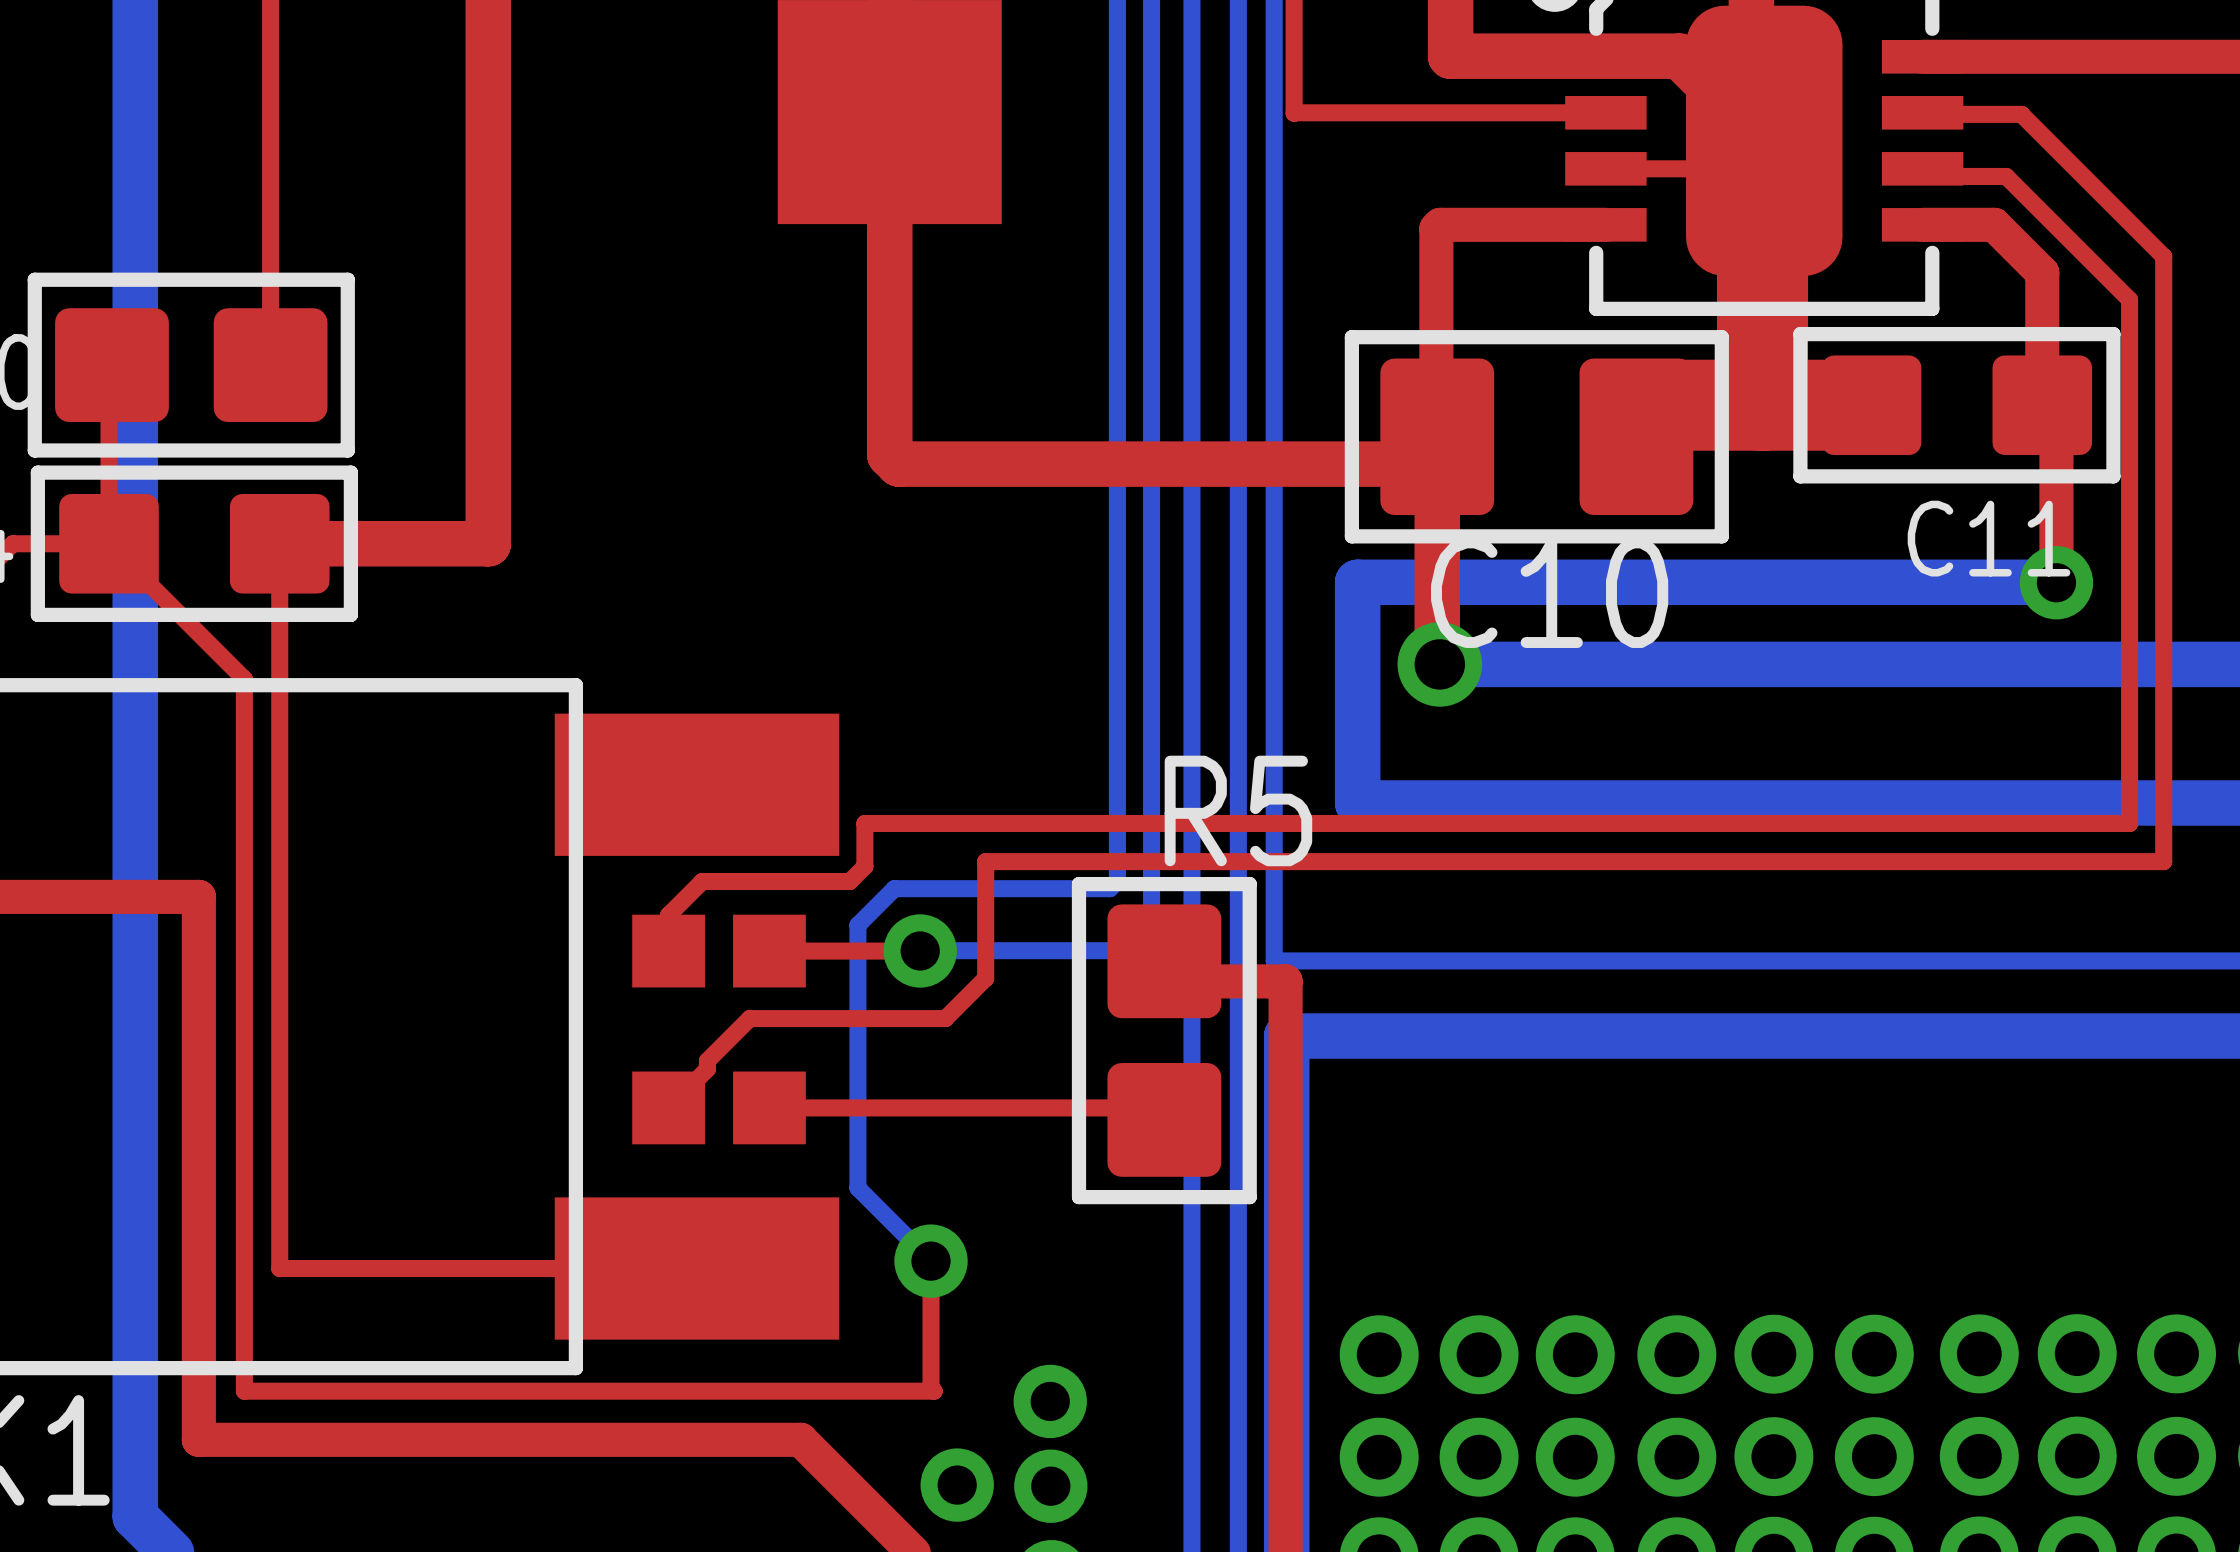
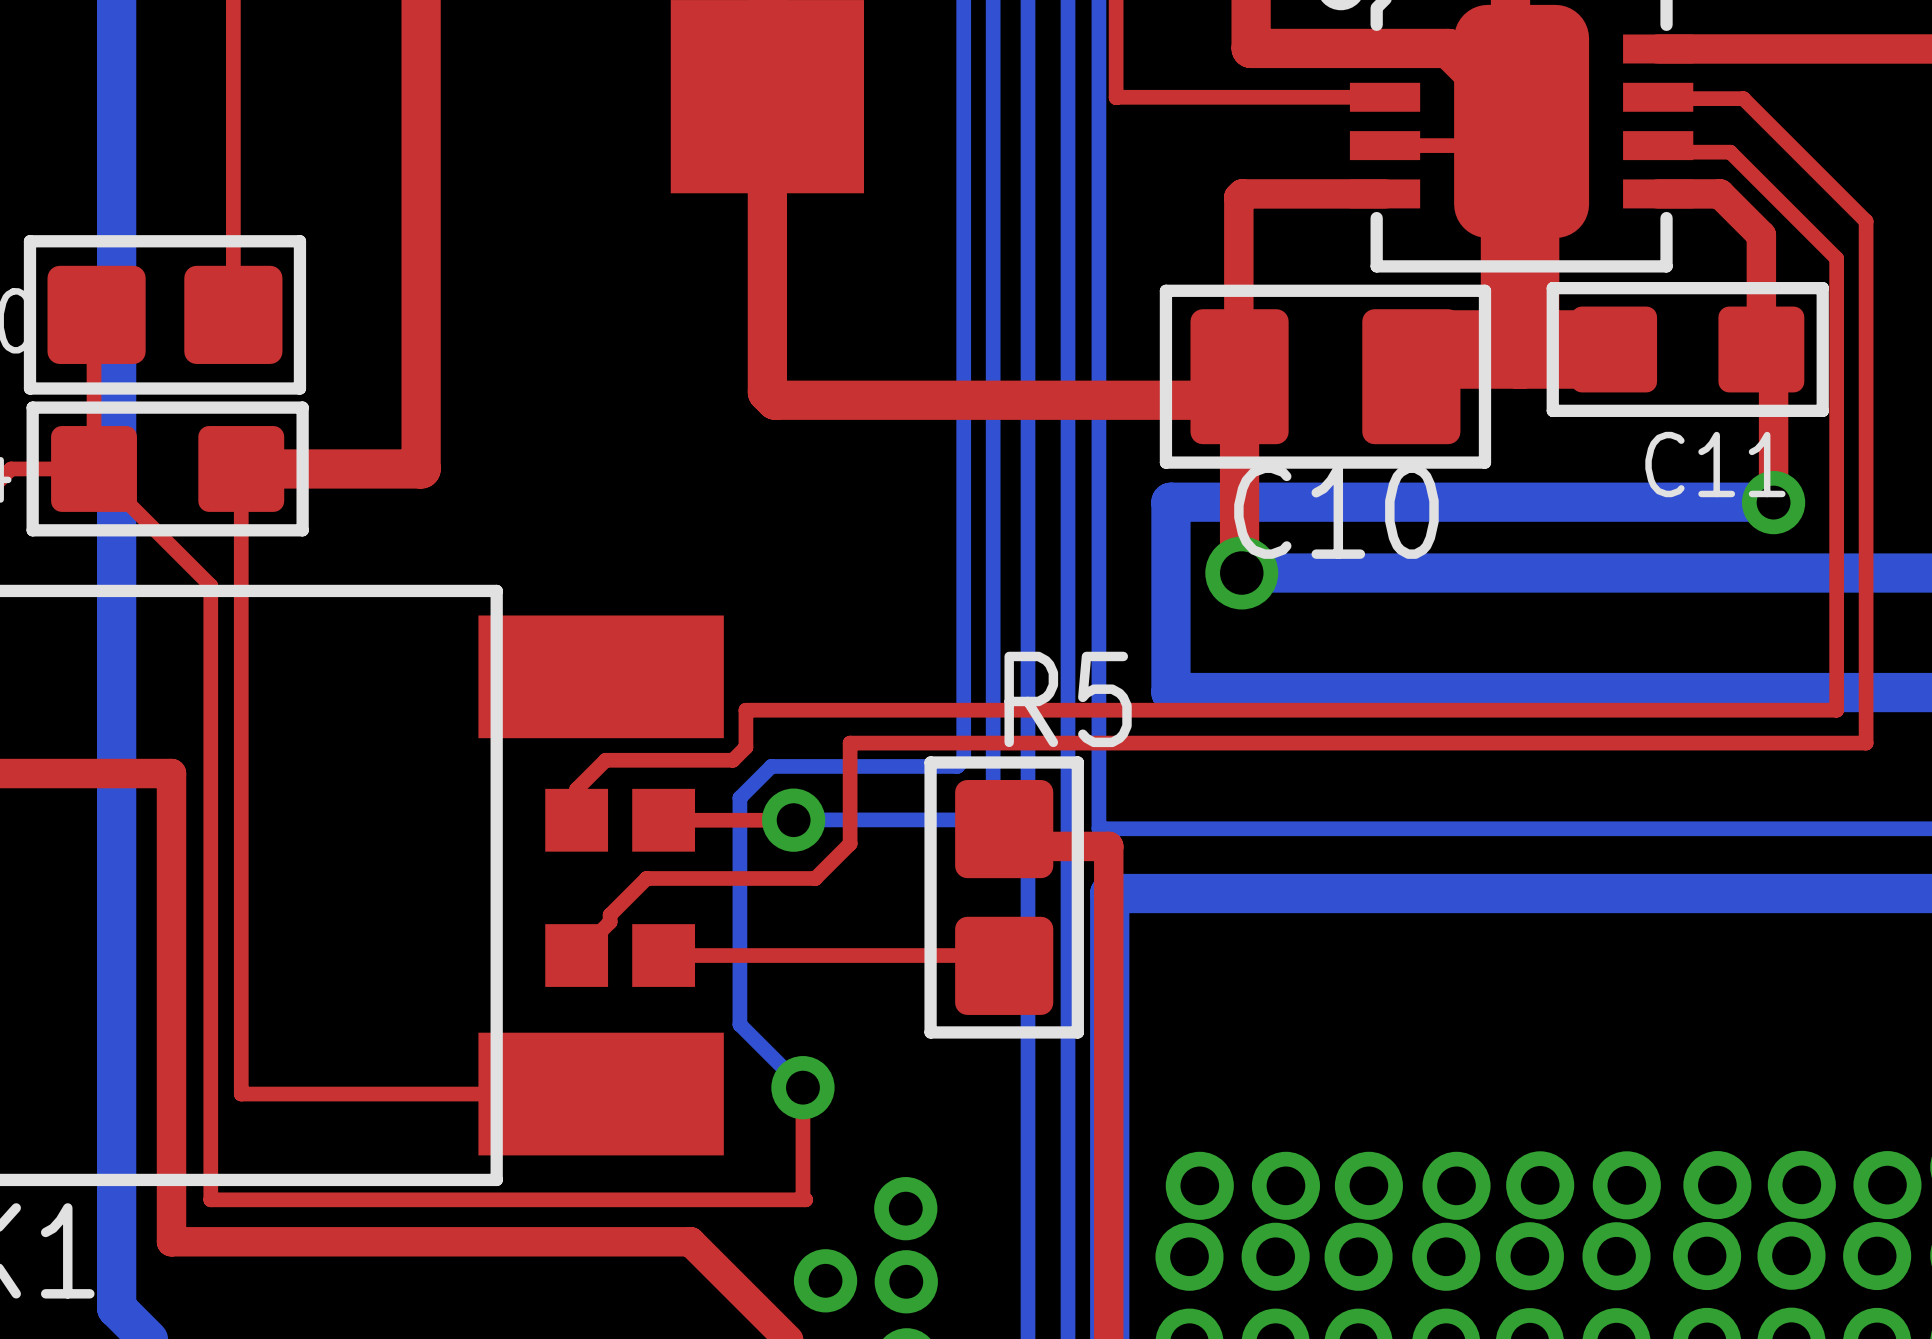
via position: (1979, 1353) -> (1717, 1185)
via position: (2077, 1353) -> (1801, 1184)
via position: (2176, 1353) -> (1887, 1185)
via position: (1379, 1354) -> (1199, 1185)
via position: (1479, 1354) -> (1285, 1185)
via position: (1575, 1354) -> (1368, 1185)
via position: (1676, 1354) -> (1456, 1185)
via position: (1773, 1354) -> (1540, 1185)
via position: (1874, 1354) -> (1626, 1185)

